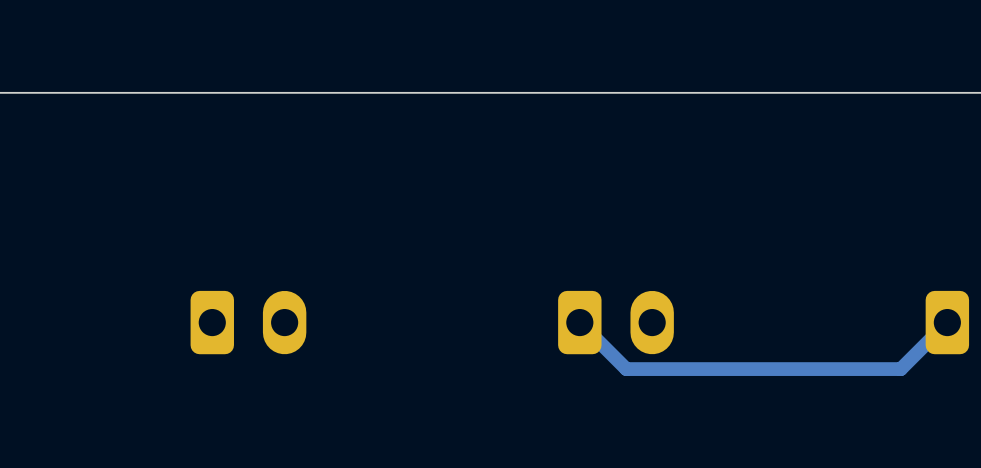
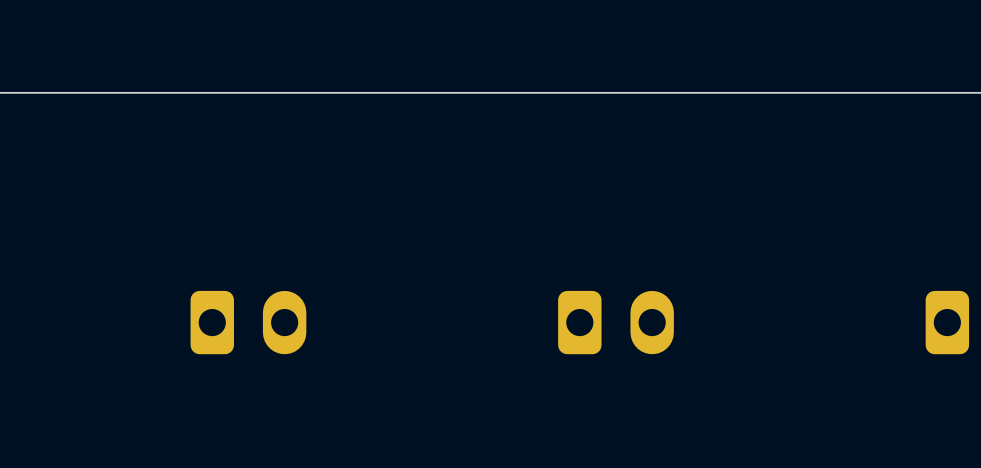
track: (947, 322) (900, 369) (626, 369) (579, 322) -> none

